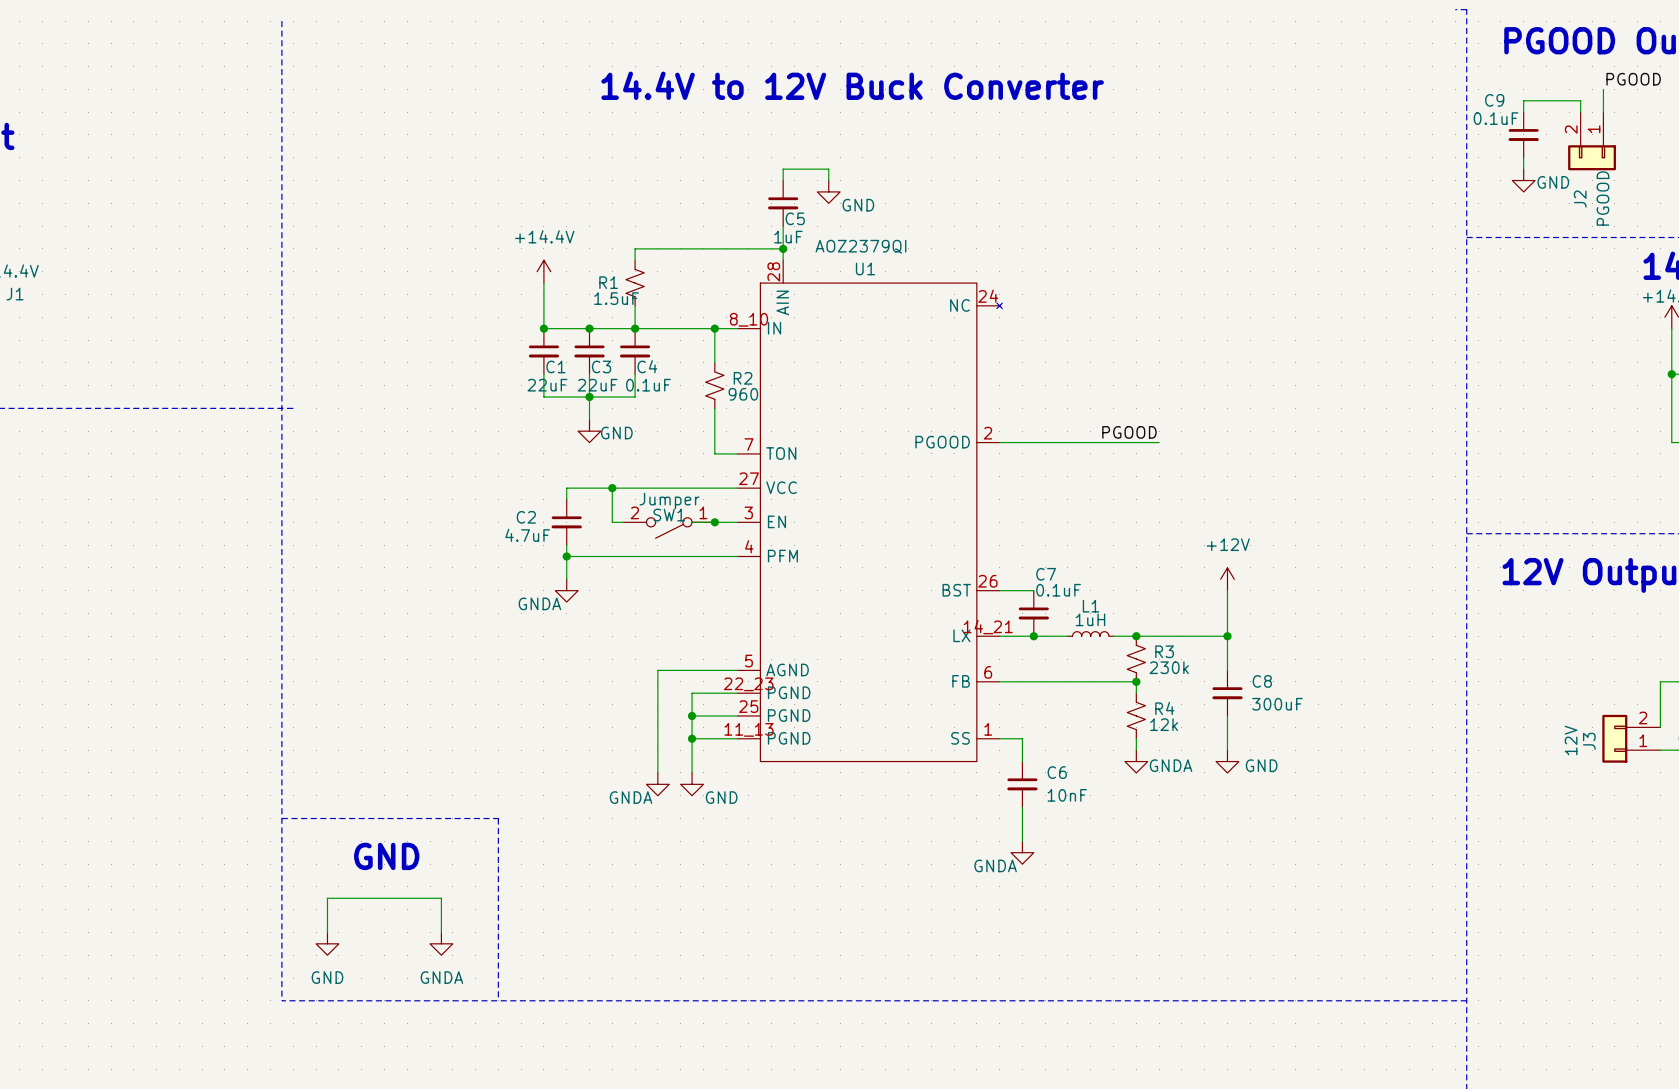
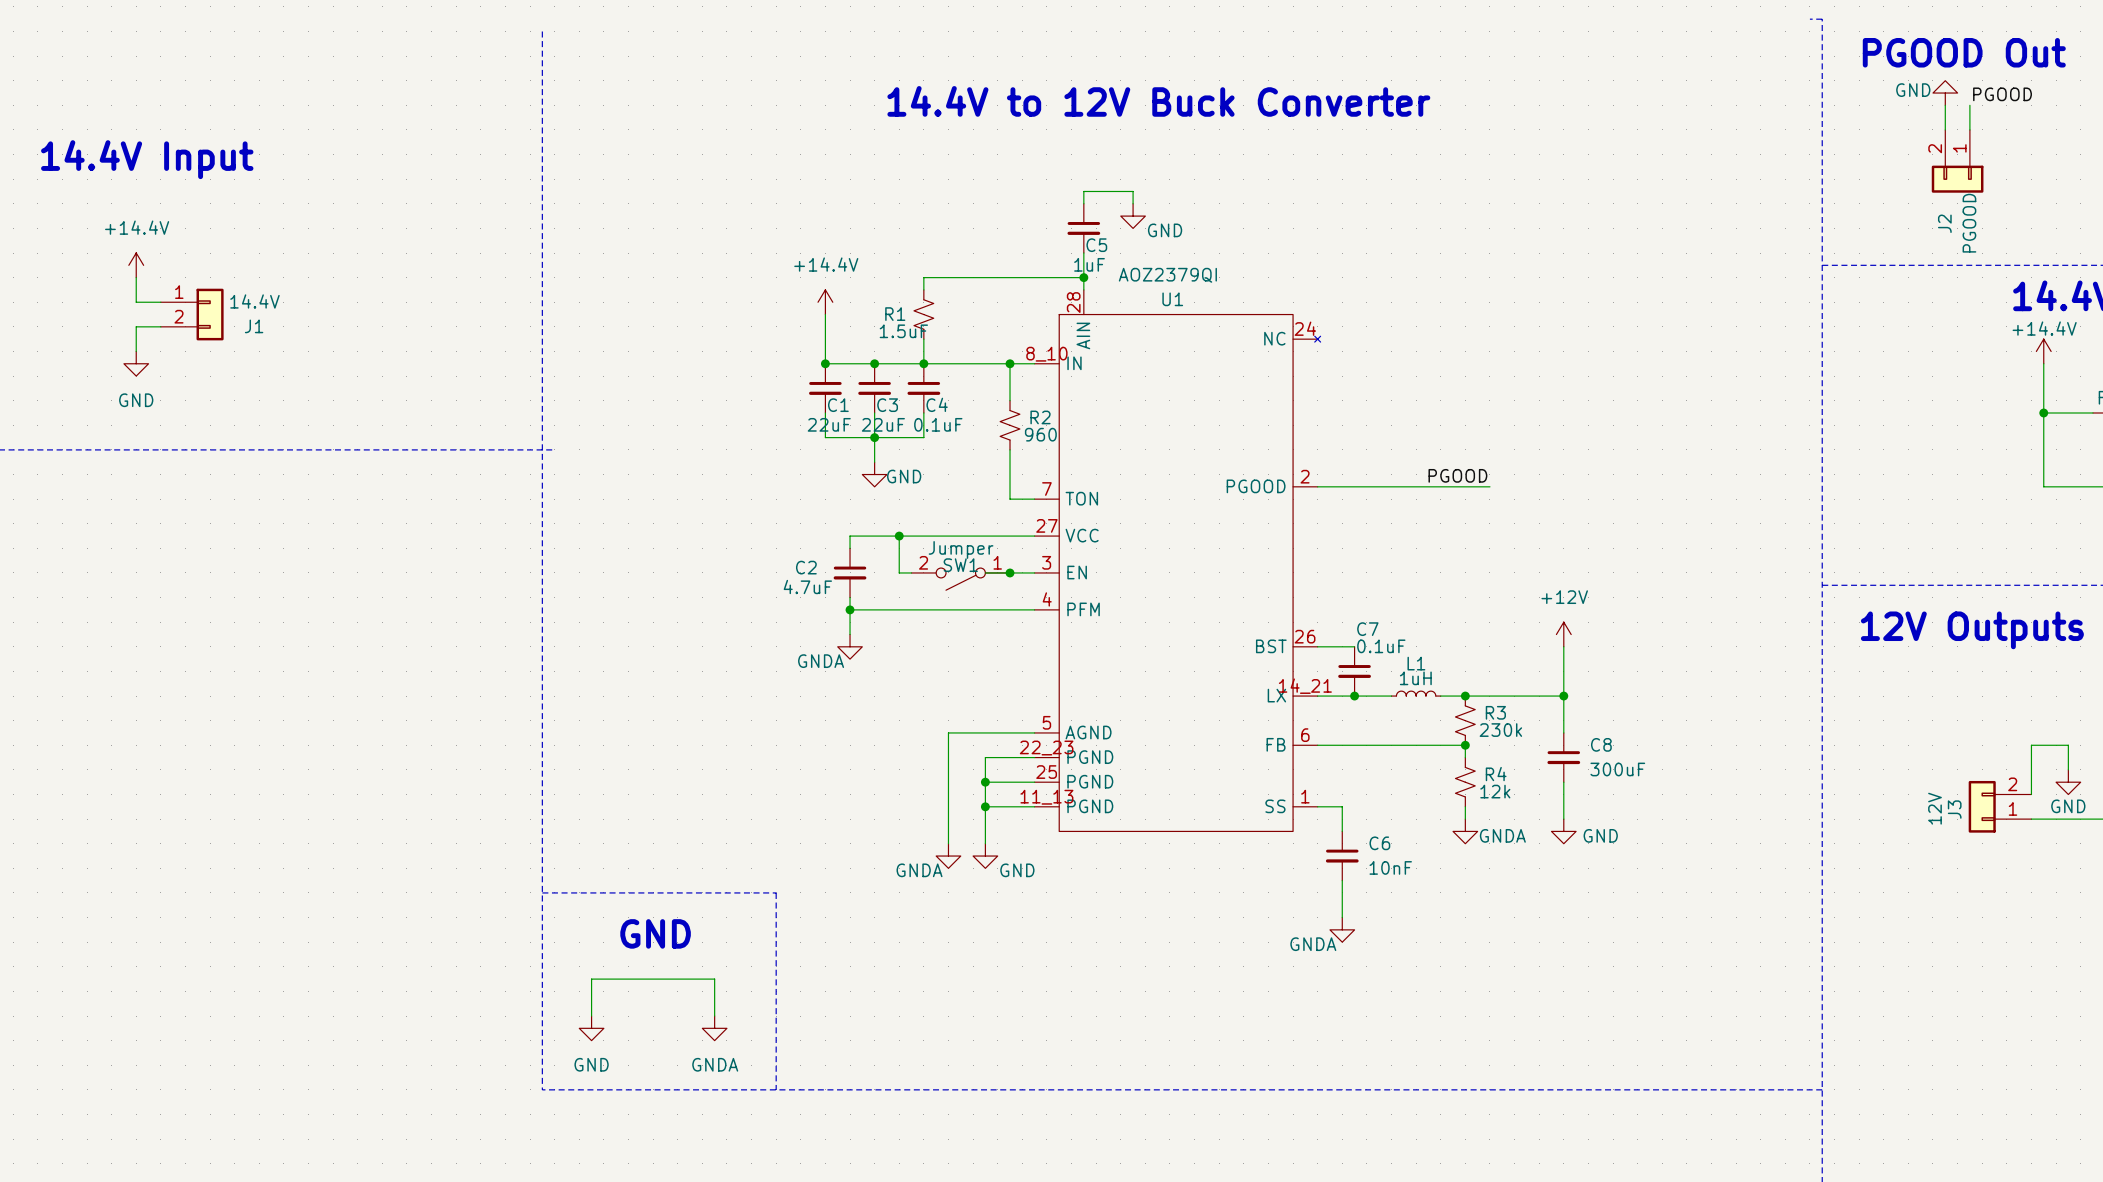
wire: (1580, 100) (1523, 100) (1523, 112) -> (1945, 117) (1945, 105)
C9: 0.1uF (1523, 134) -> none
wire: (1523, 157) (1523, 169) -> none
power symbol rotation: 0° (1523, 180) -> 180° (1945, 93)
power symbol position: GND (1523, 180) -> GND (1945, 93)

